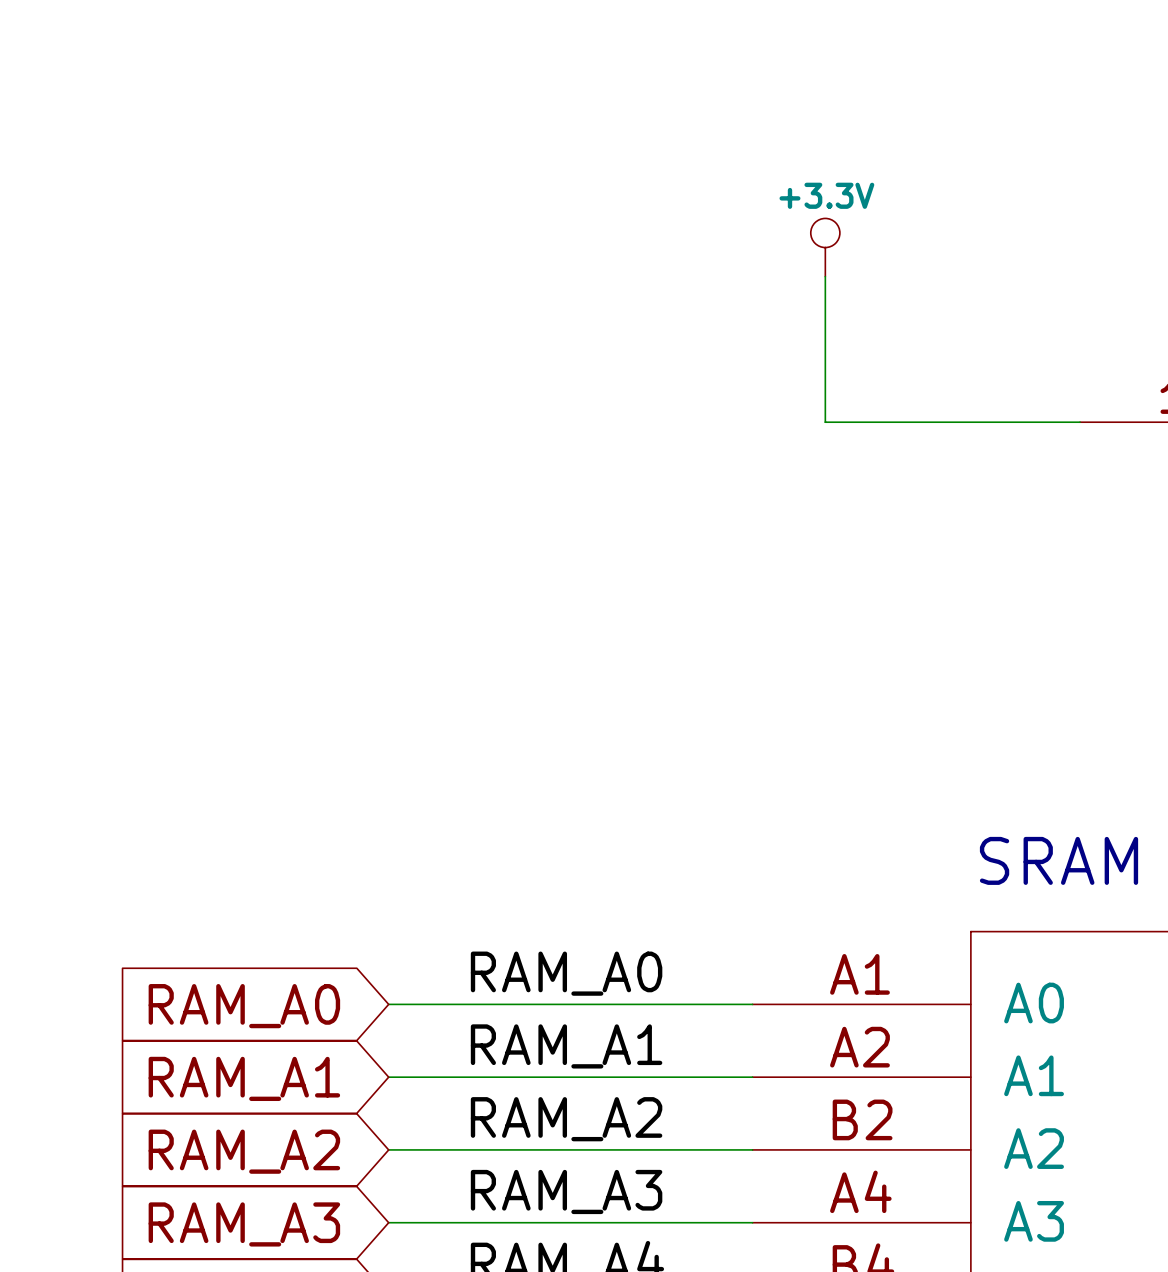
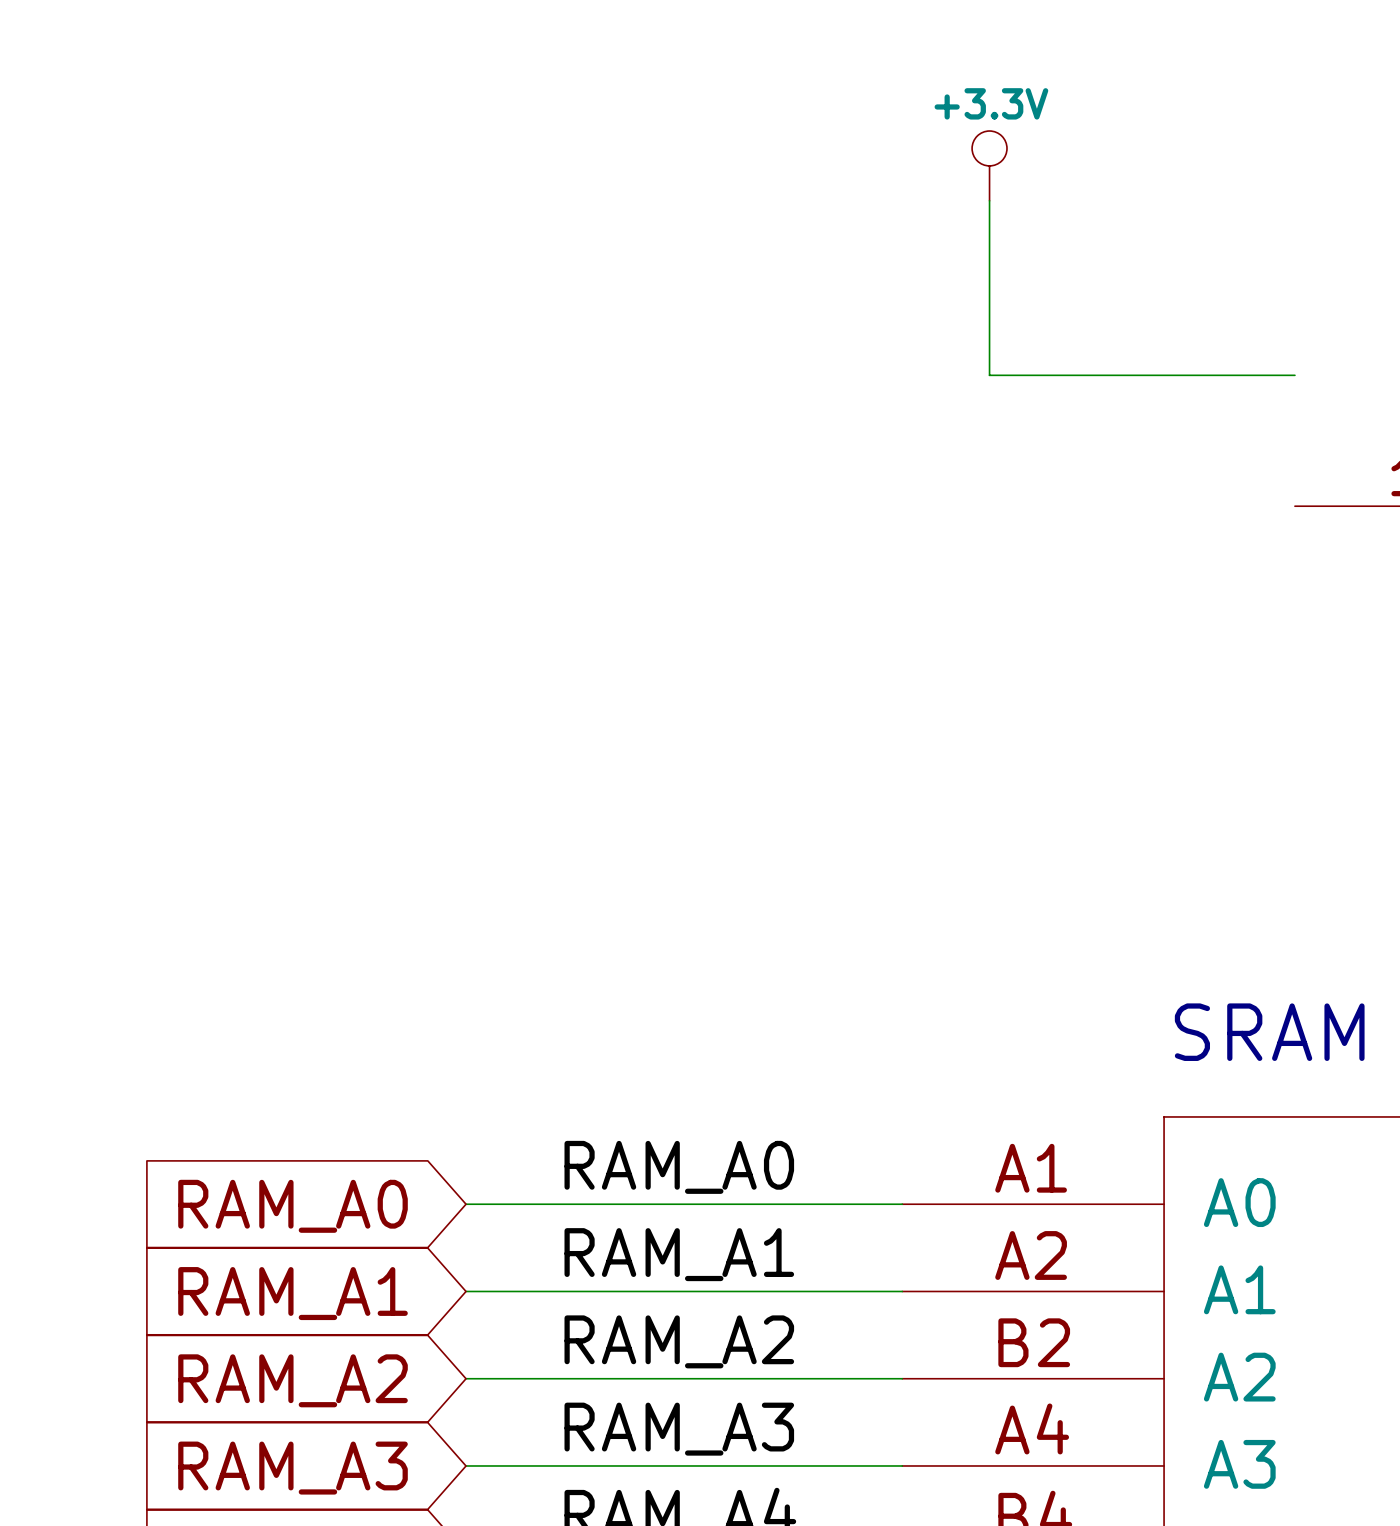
wire: none -> (989, 200) (989, 331)
power symbol position: +3.3V (825, 247) -> +3.3V (989, 165)
wire: (825, 313) (825, 422) (1080, 422) -> (989, 375) (1294, 375)

